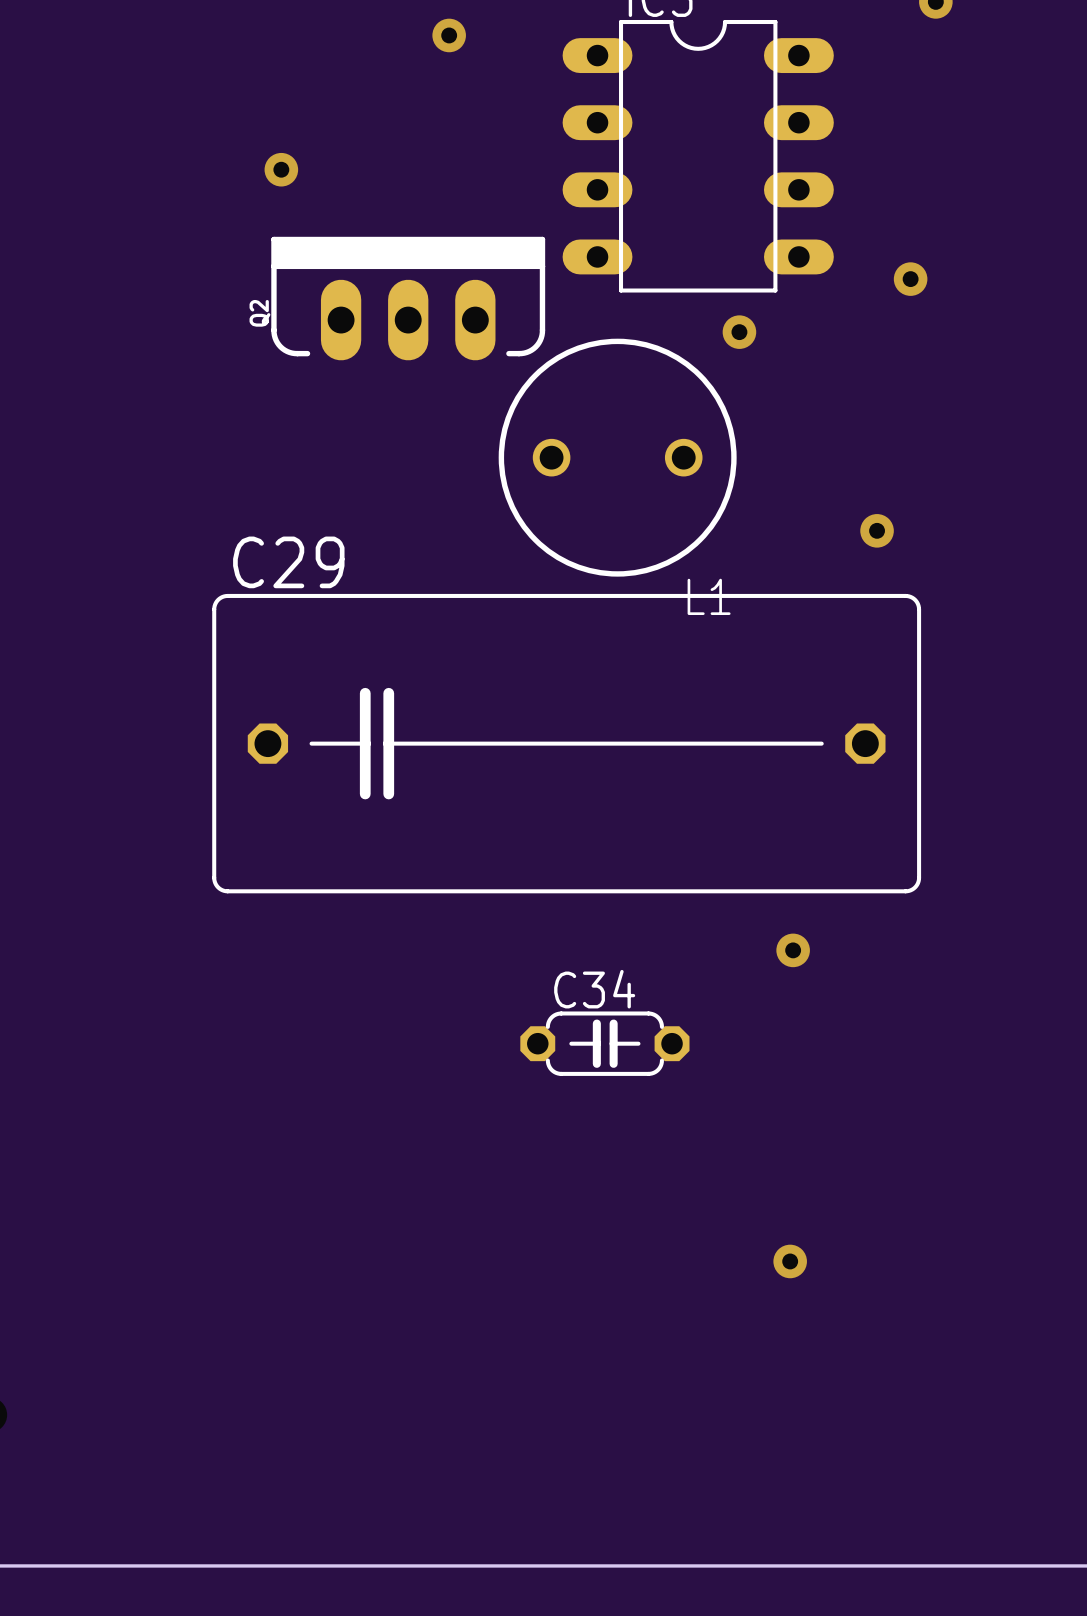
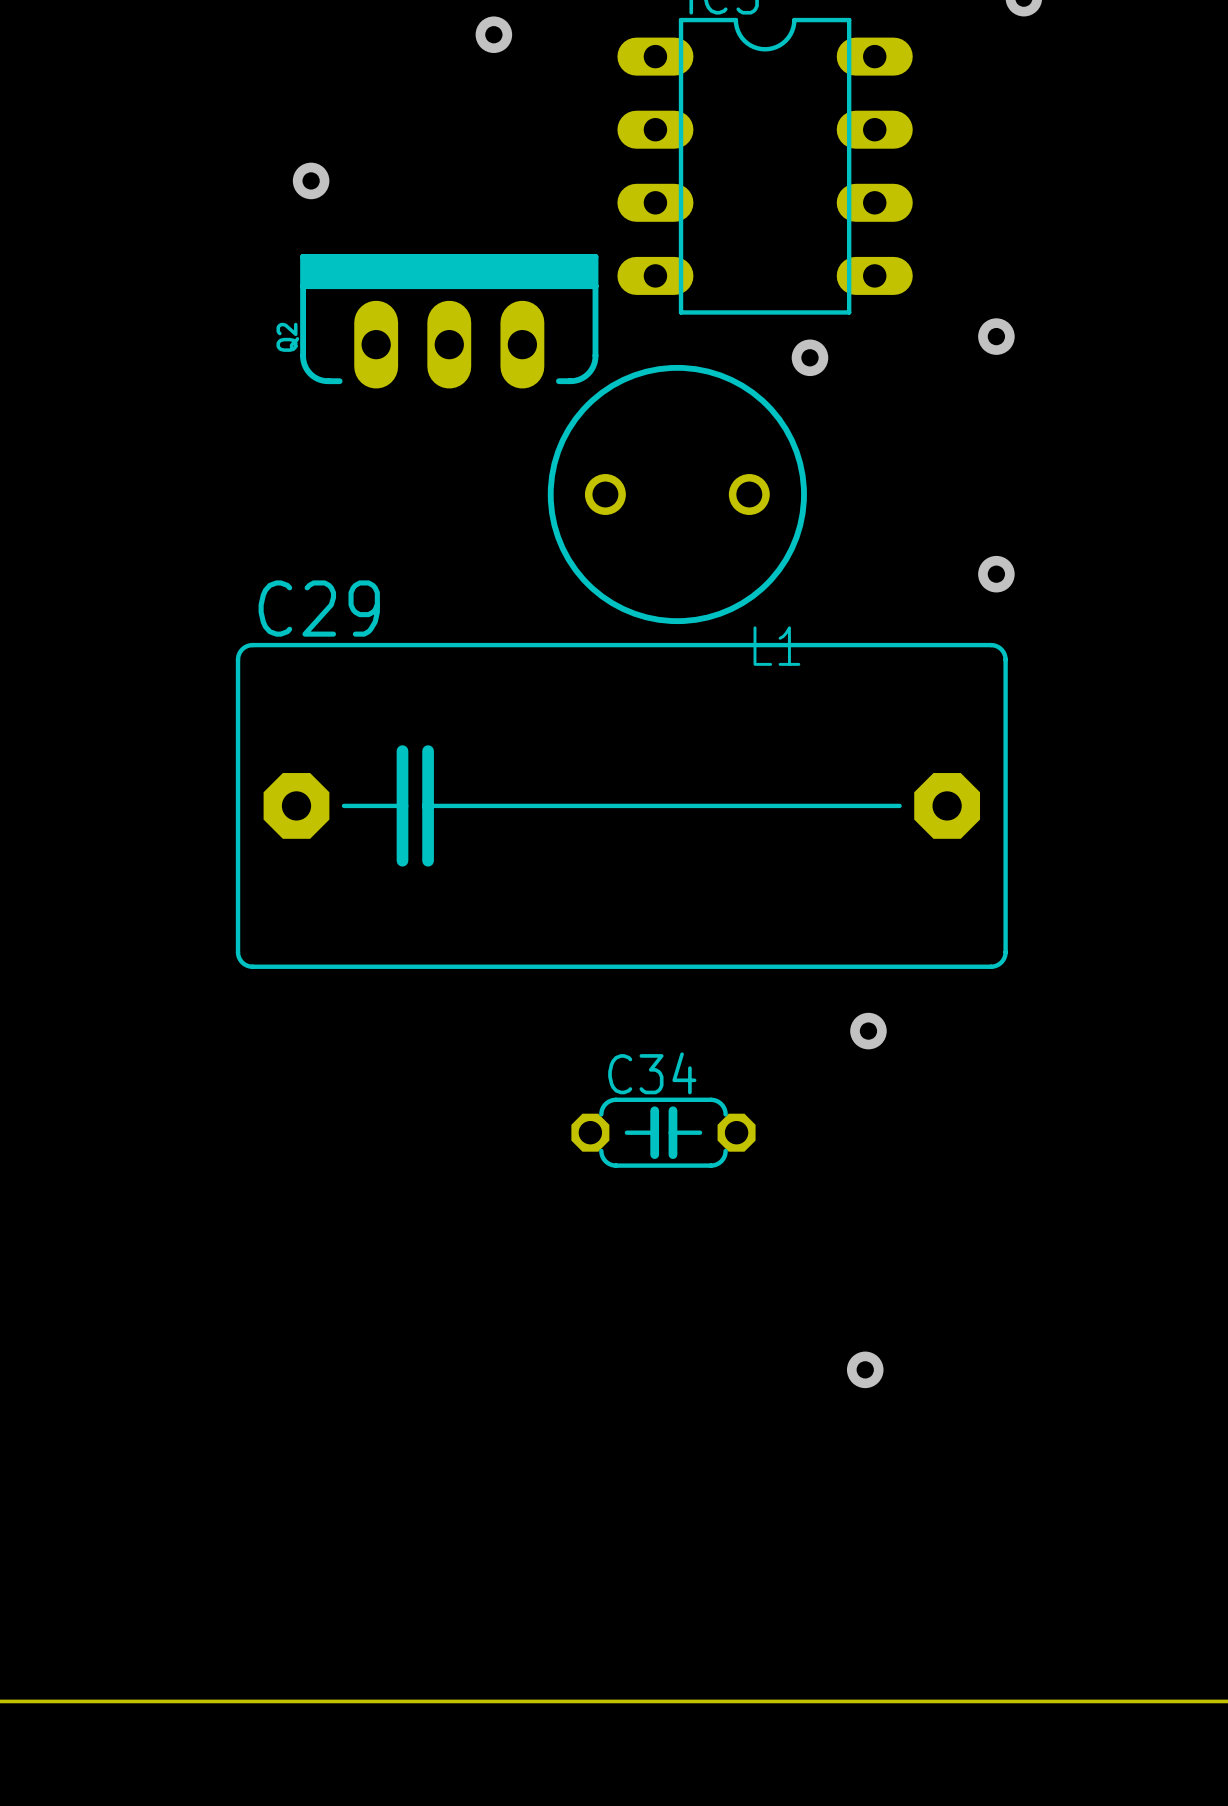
via position: (910, 279) -> (996, 336)
via position: (877, 530) -> (996, 574)
C29 footprint: [212, 593, 922, 894] -> [235, 642, 1008, 969]

